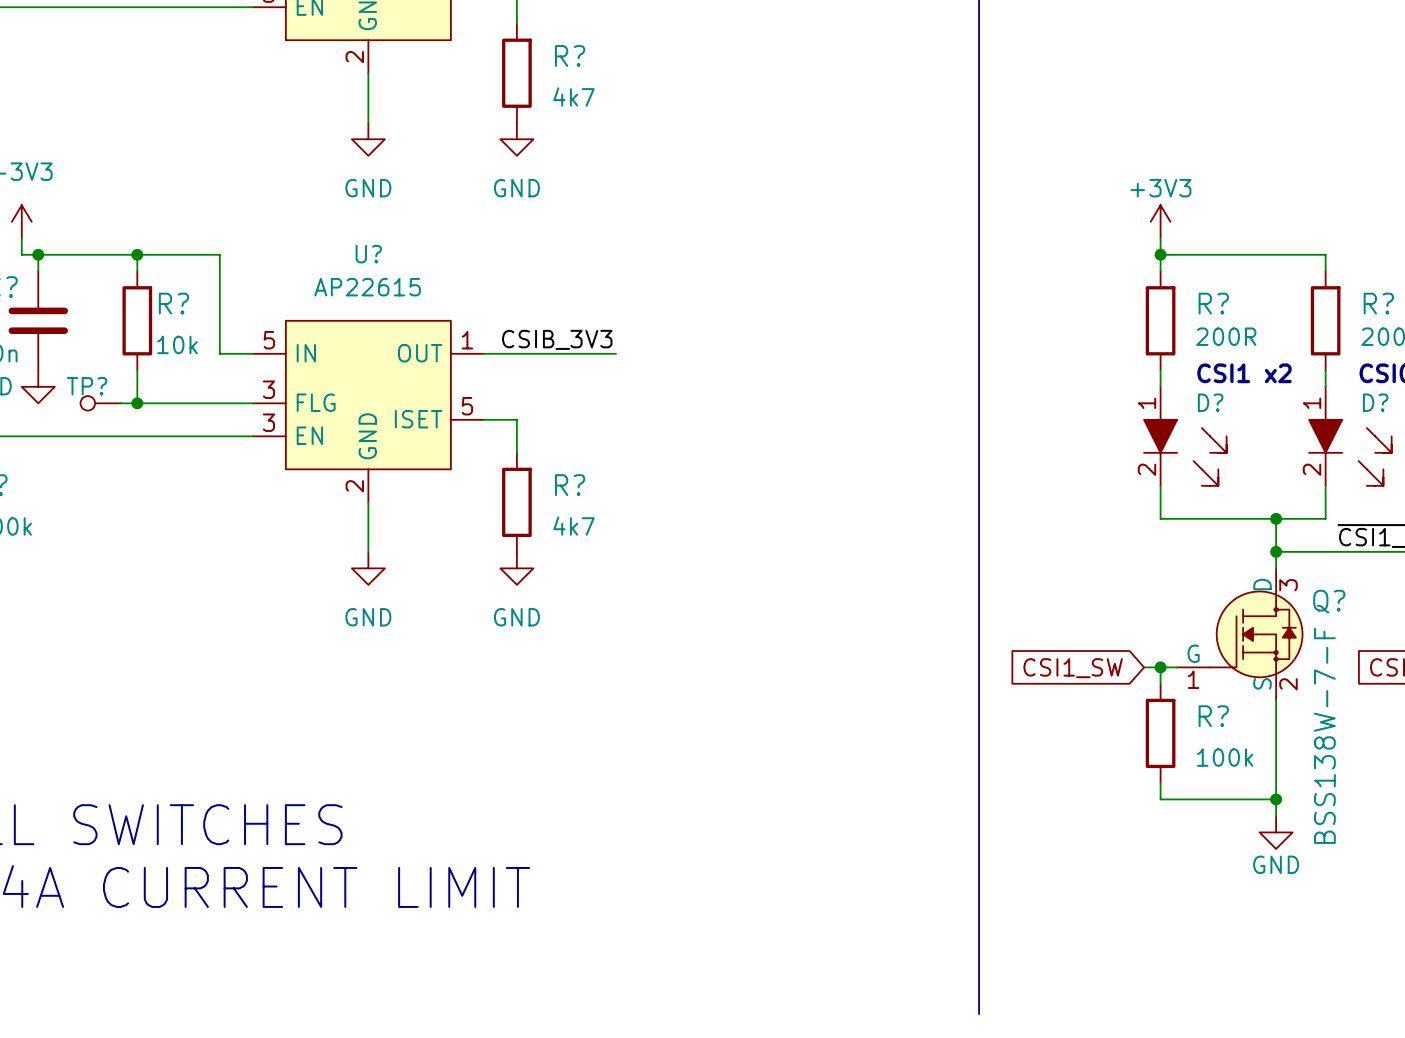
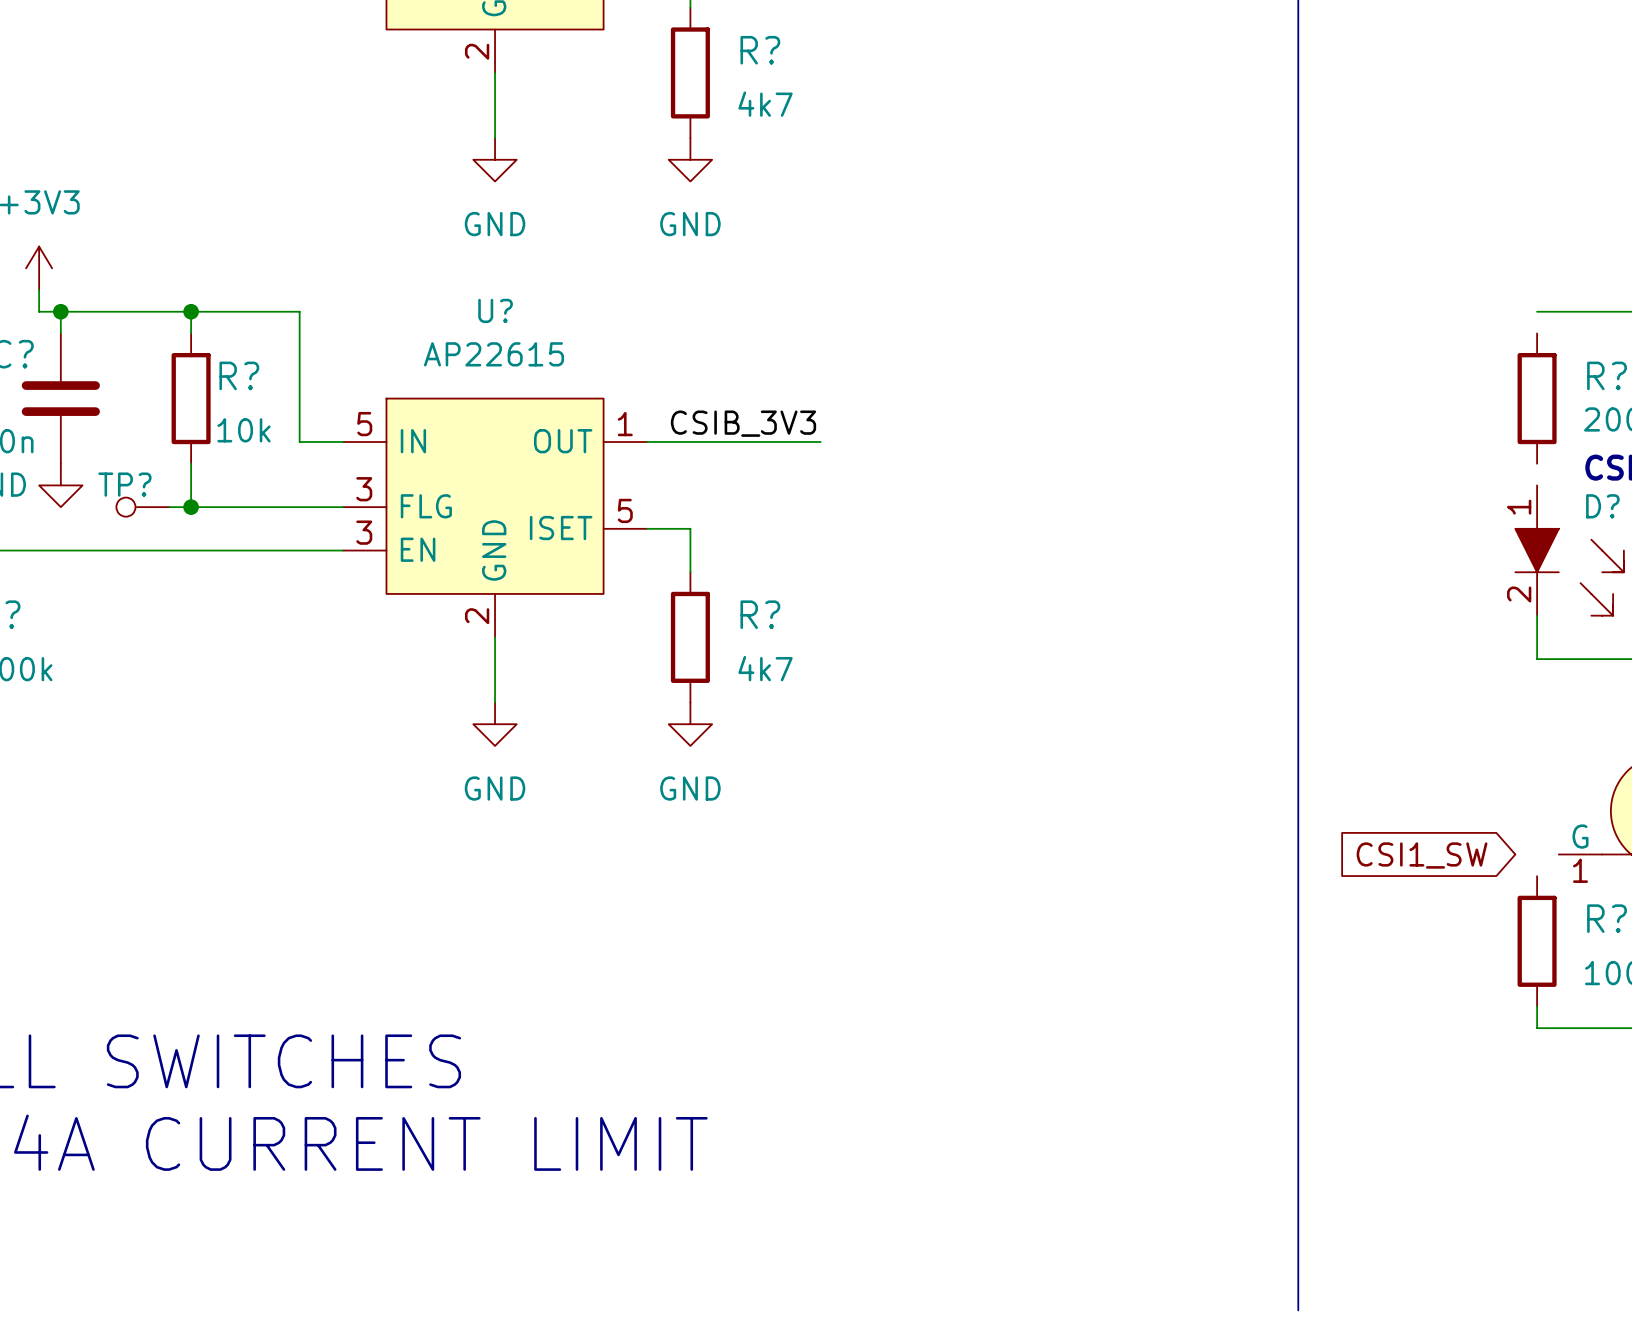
power symbol: +3V3 (1160, 221) -> none
wire: (1160, 238) (1160, 271) -> none
junction: (1160, 254) -> none
wire: (1160, 370) (1160, 386) -> none
wire: (1144, 667) (1177, 667) -> none
wire: (1160, 667) (1160, 683) -> none
junction: (1160, 667) -> none

